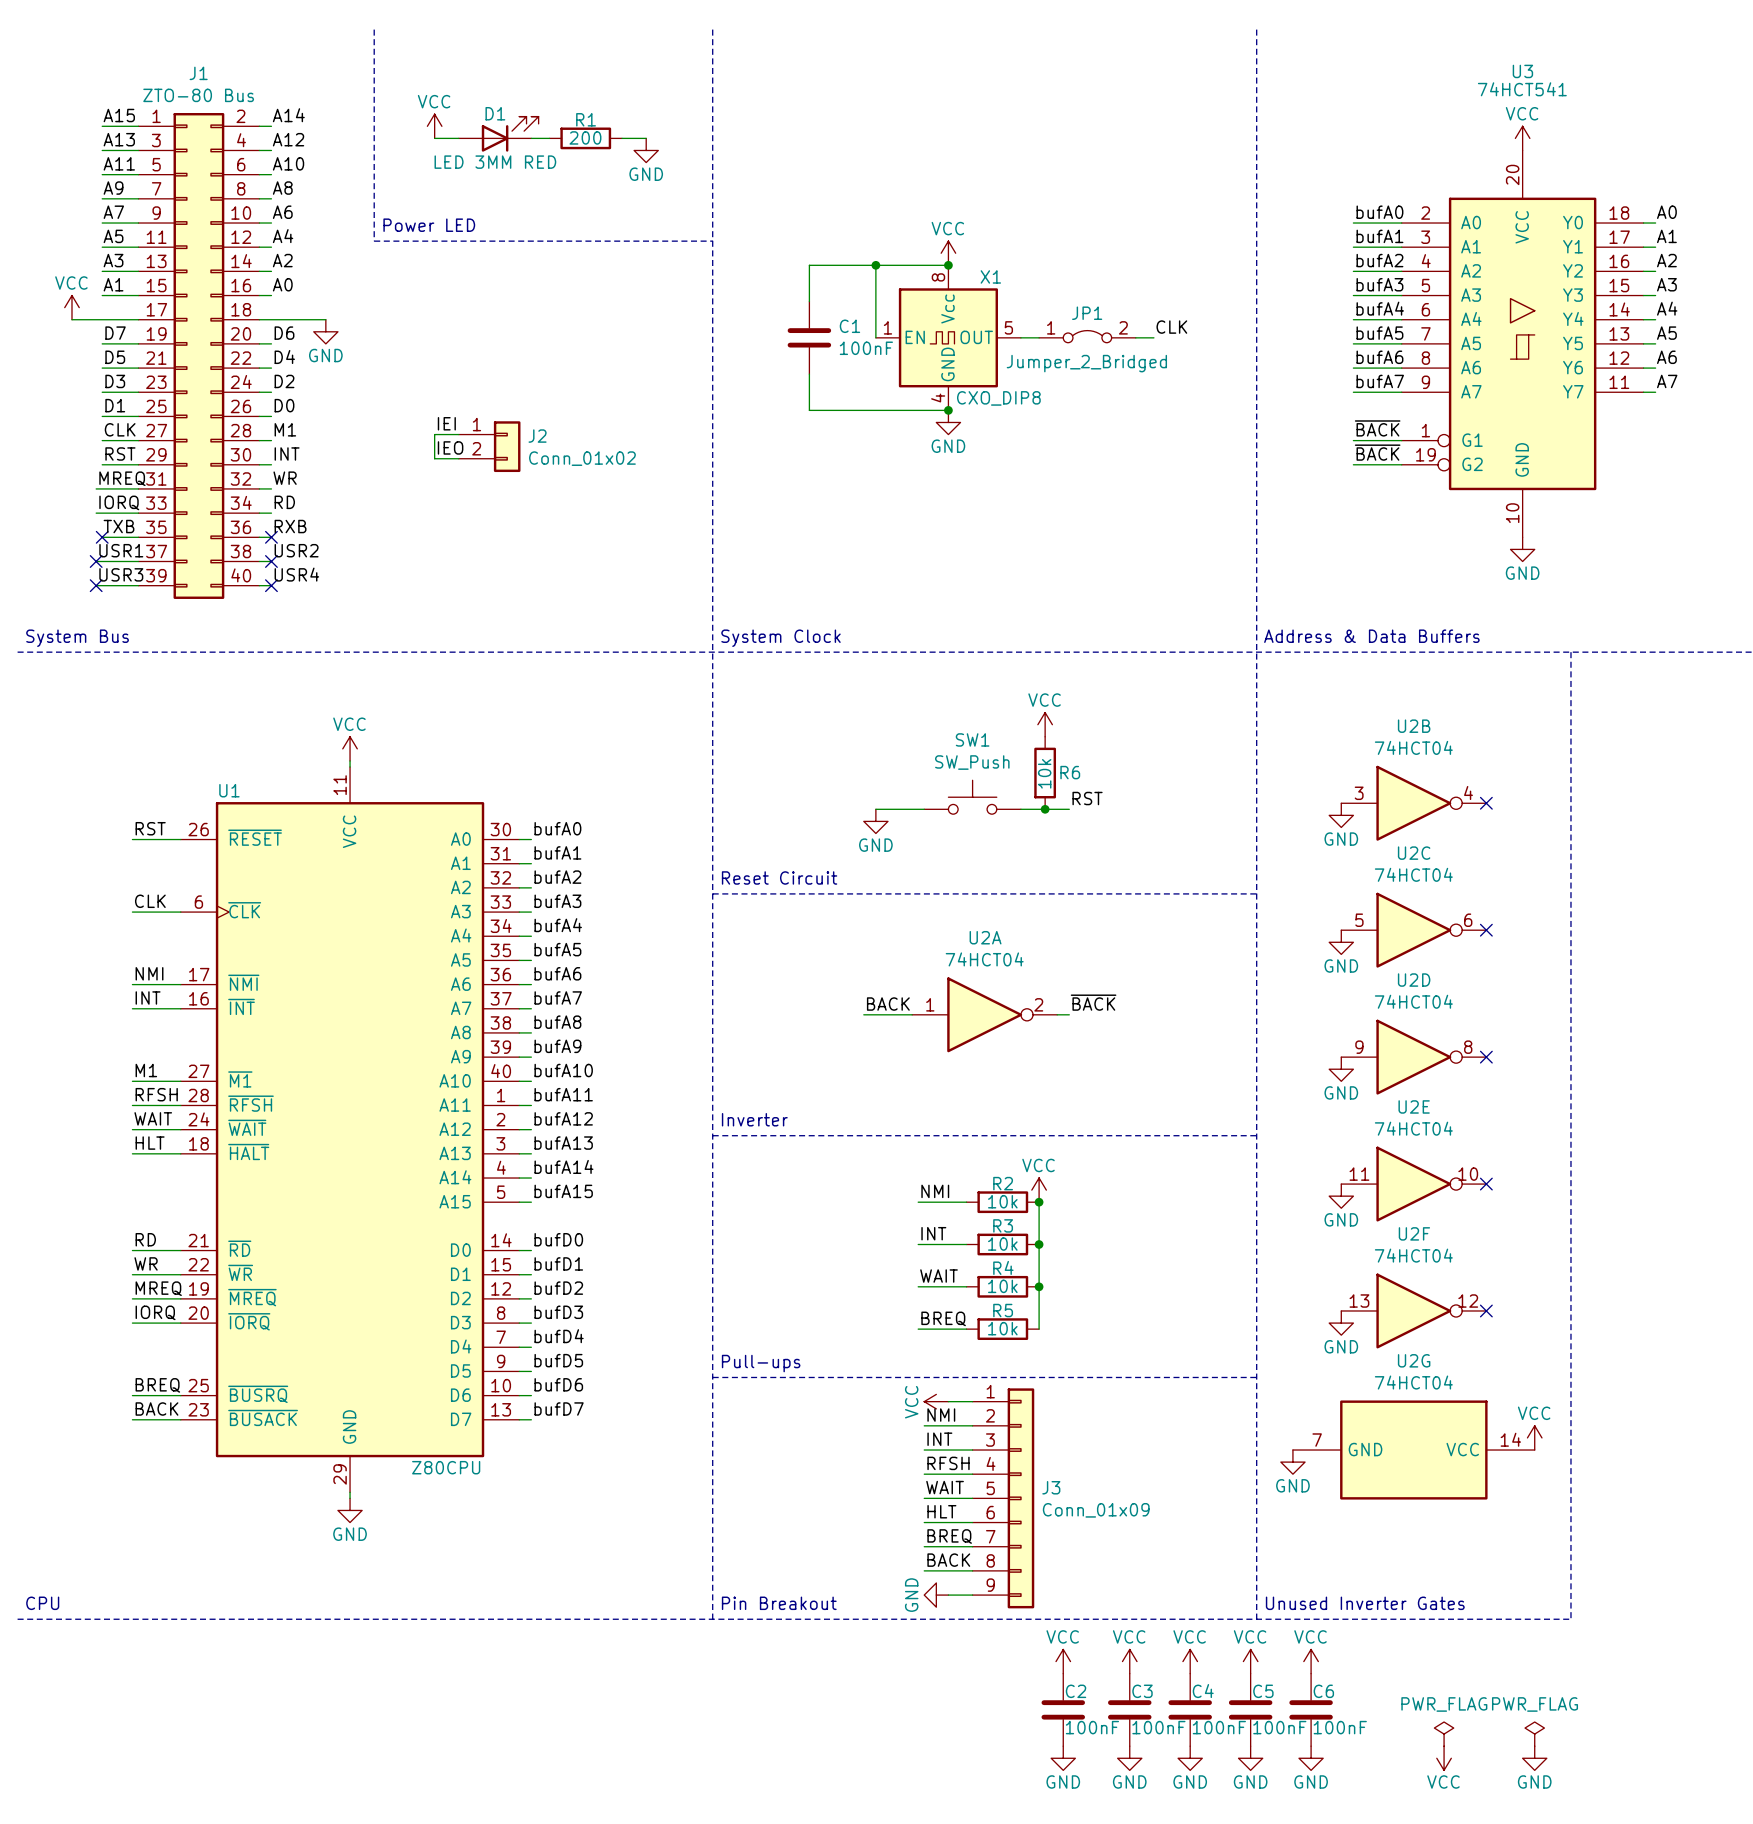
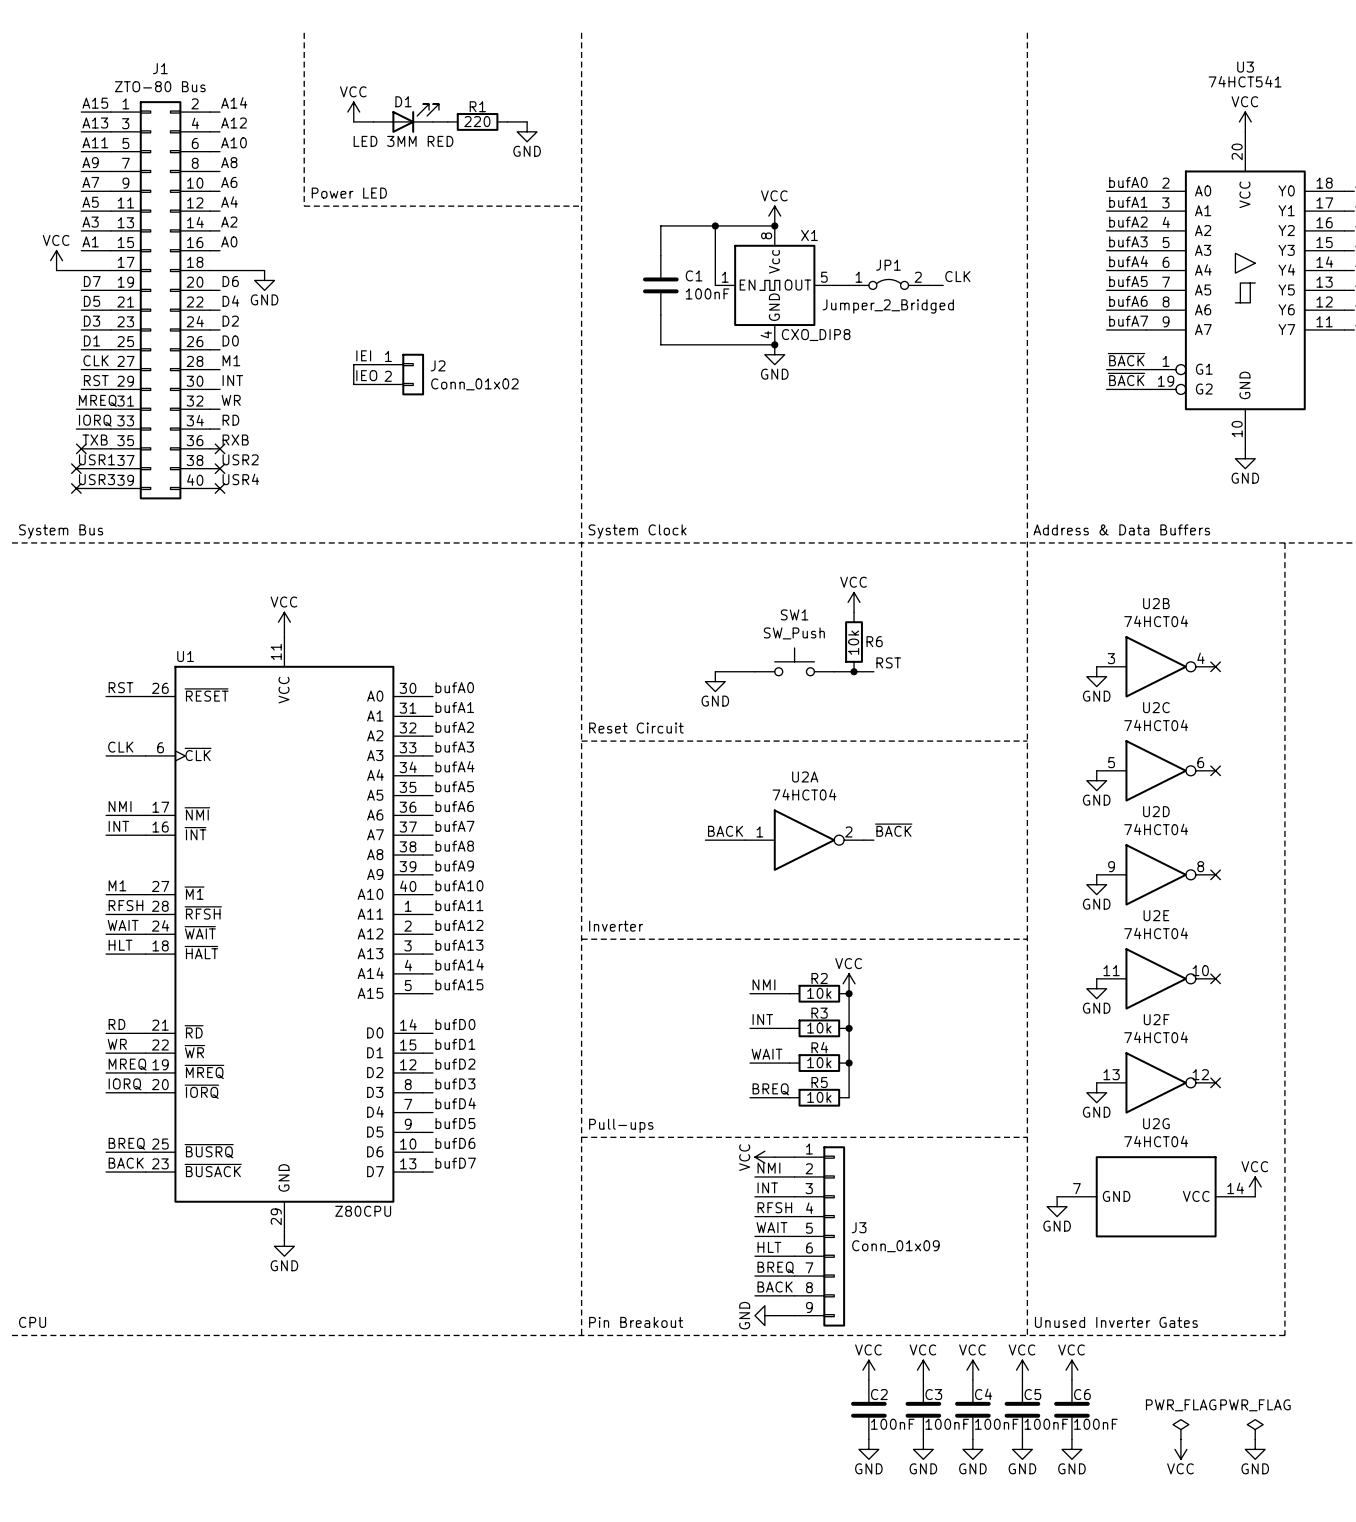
R1 value: 200 (585, 137) -> 220 (477, 121)

